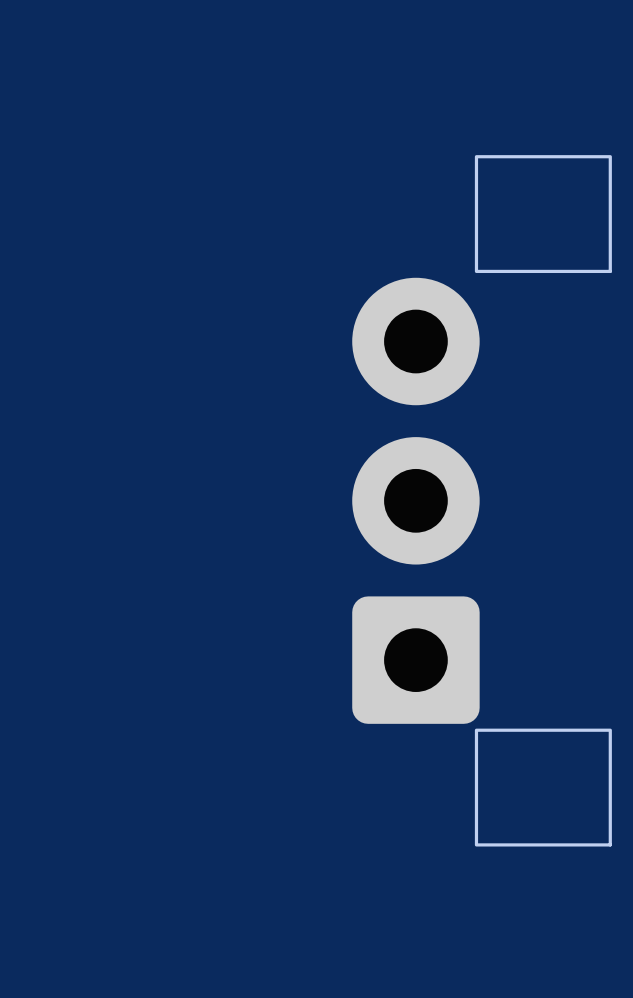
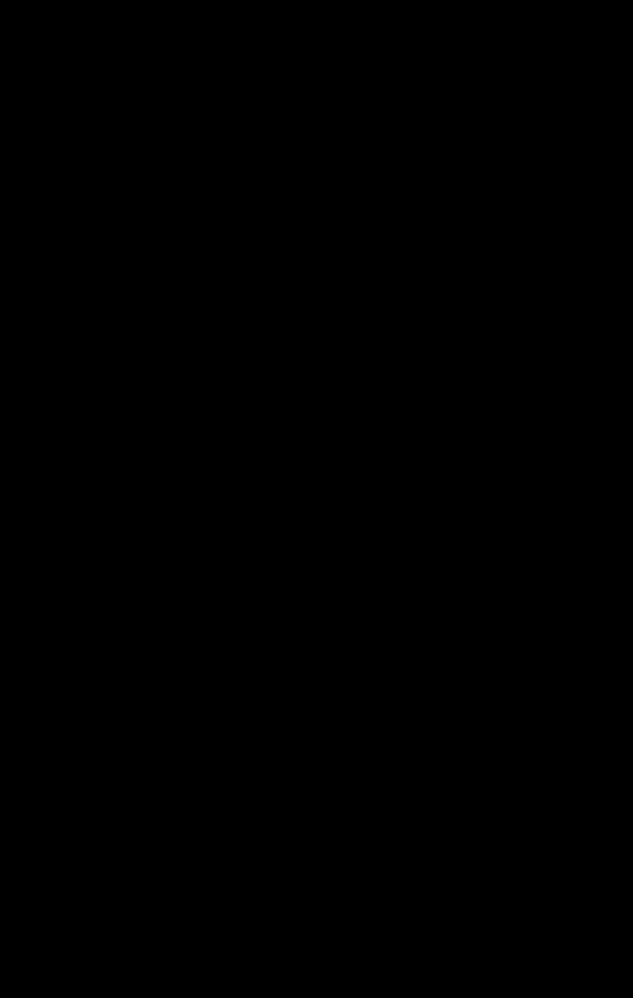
part: (482, 500) -> none

